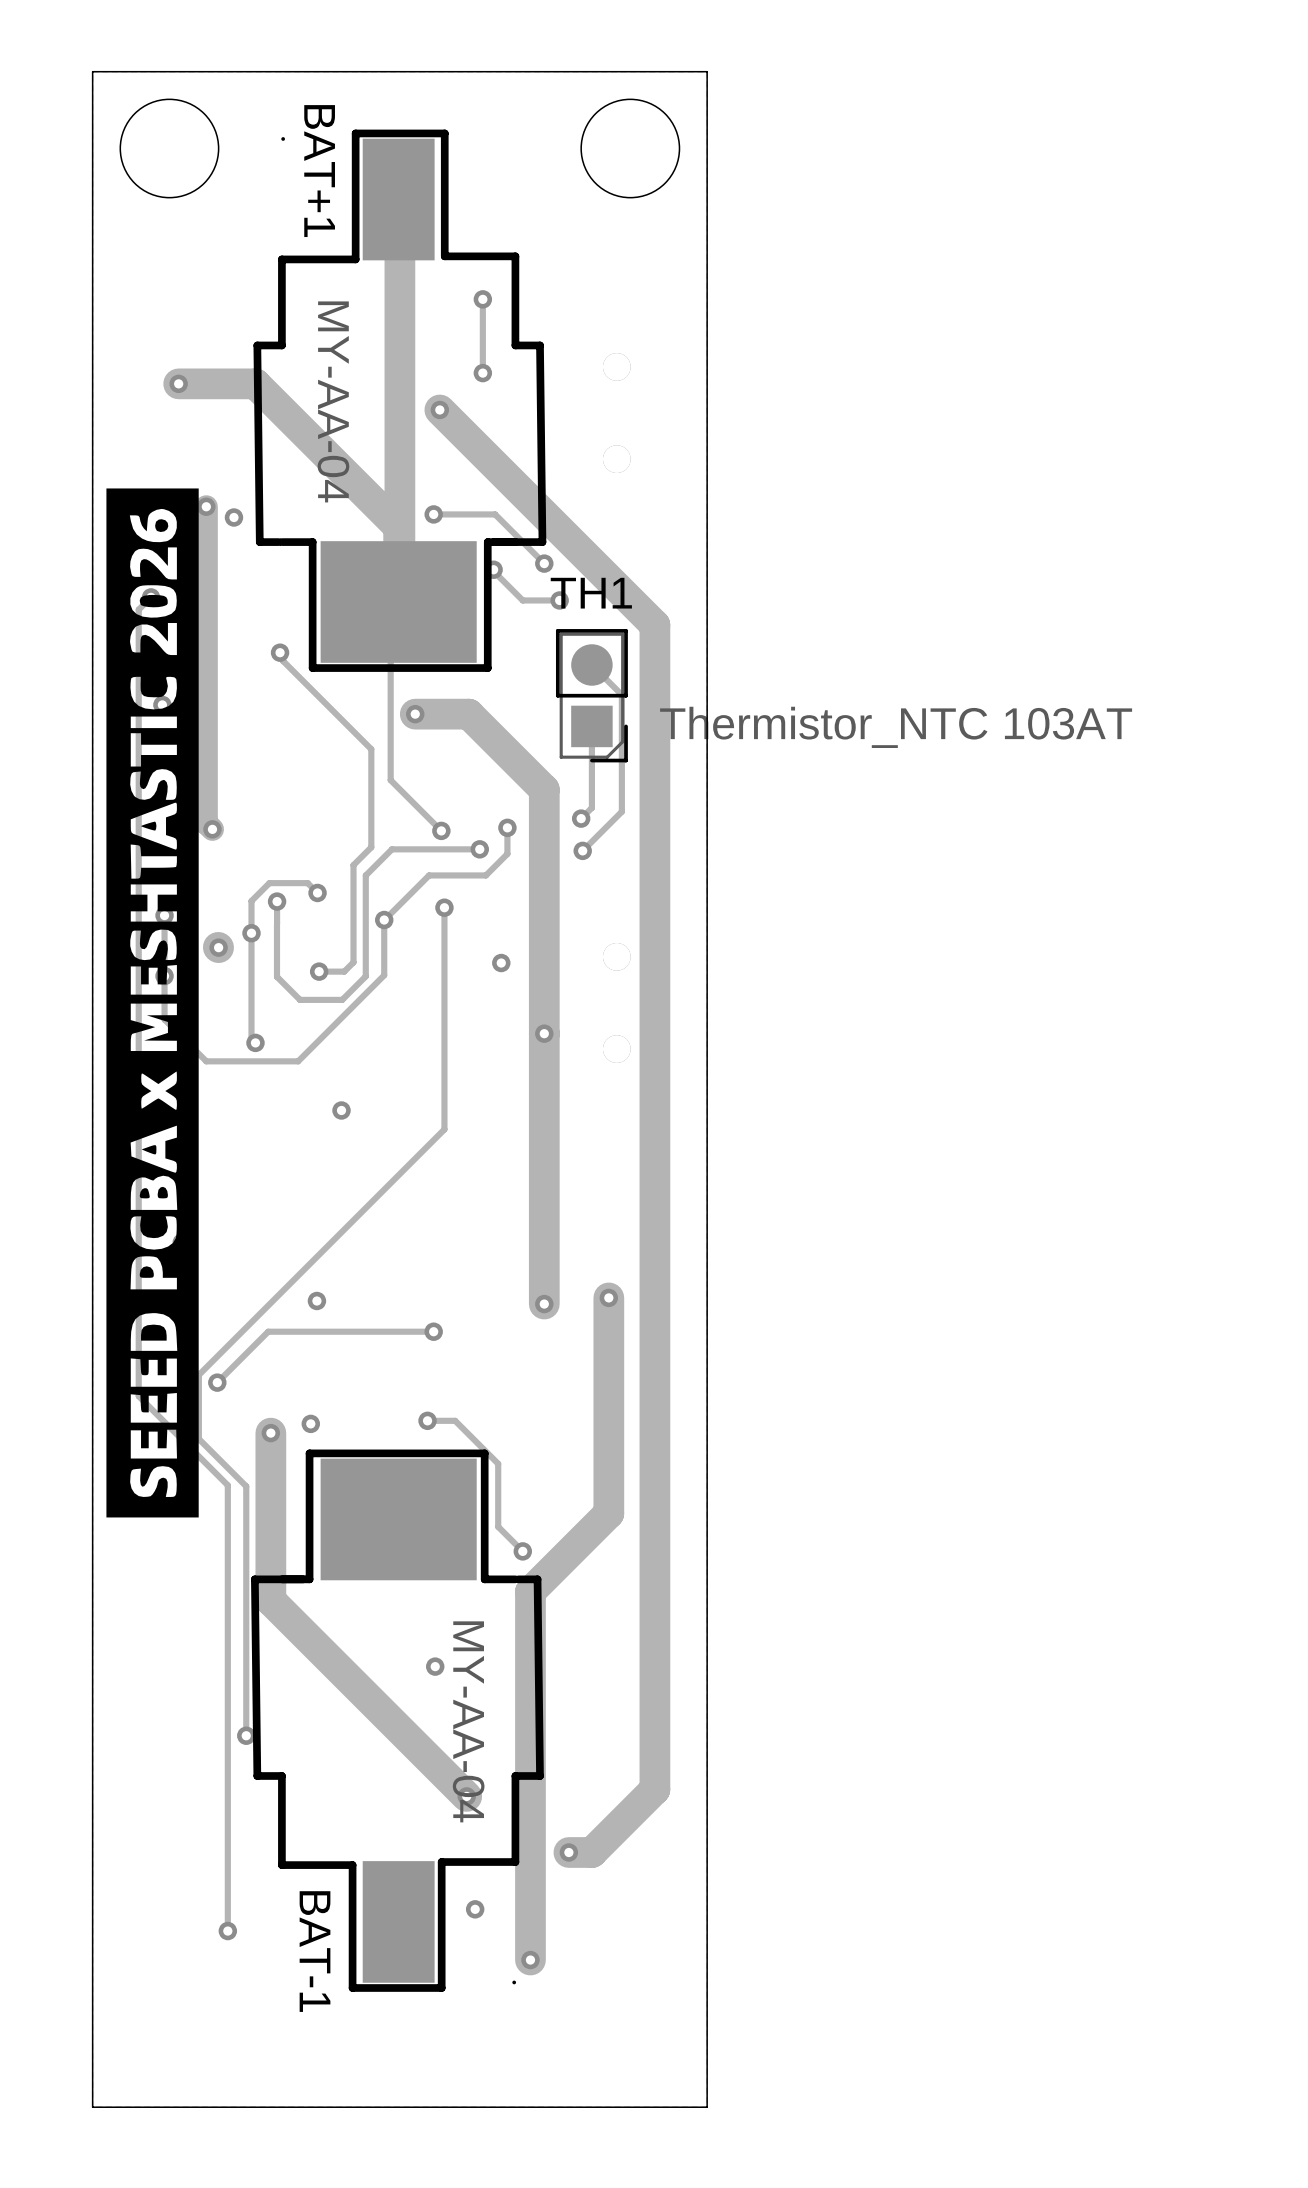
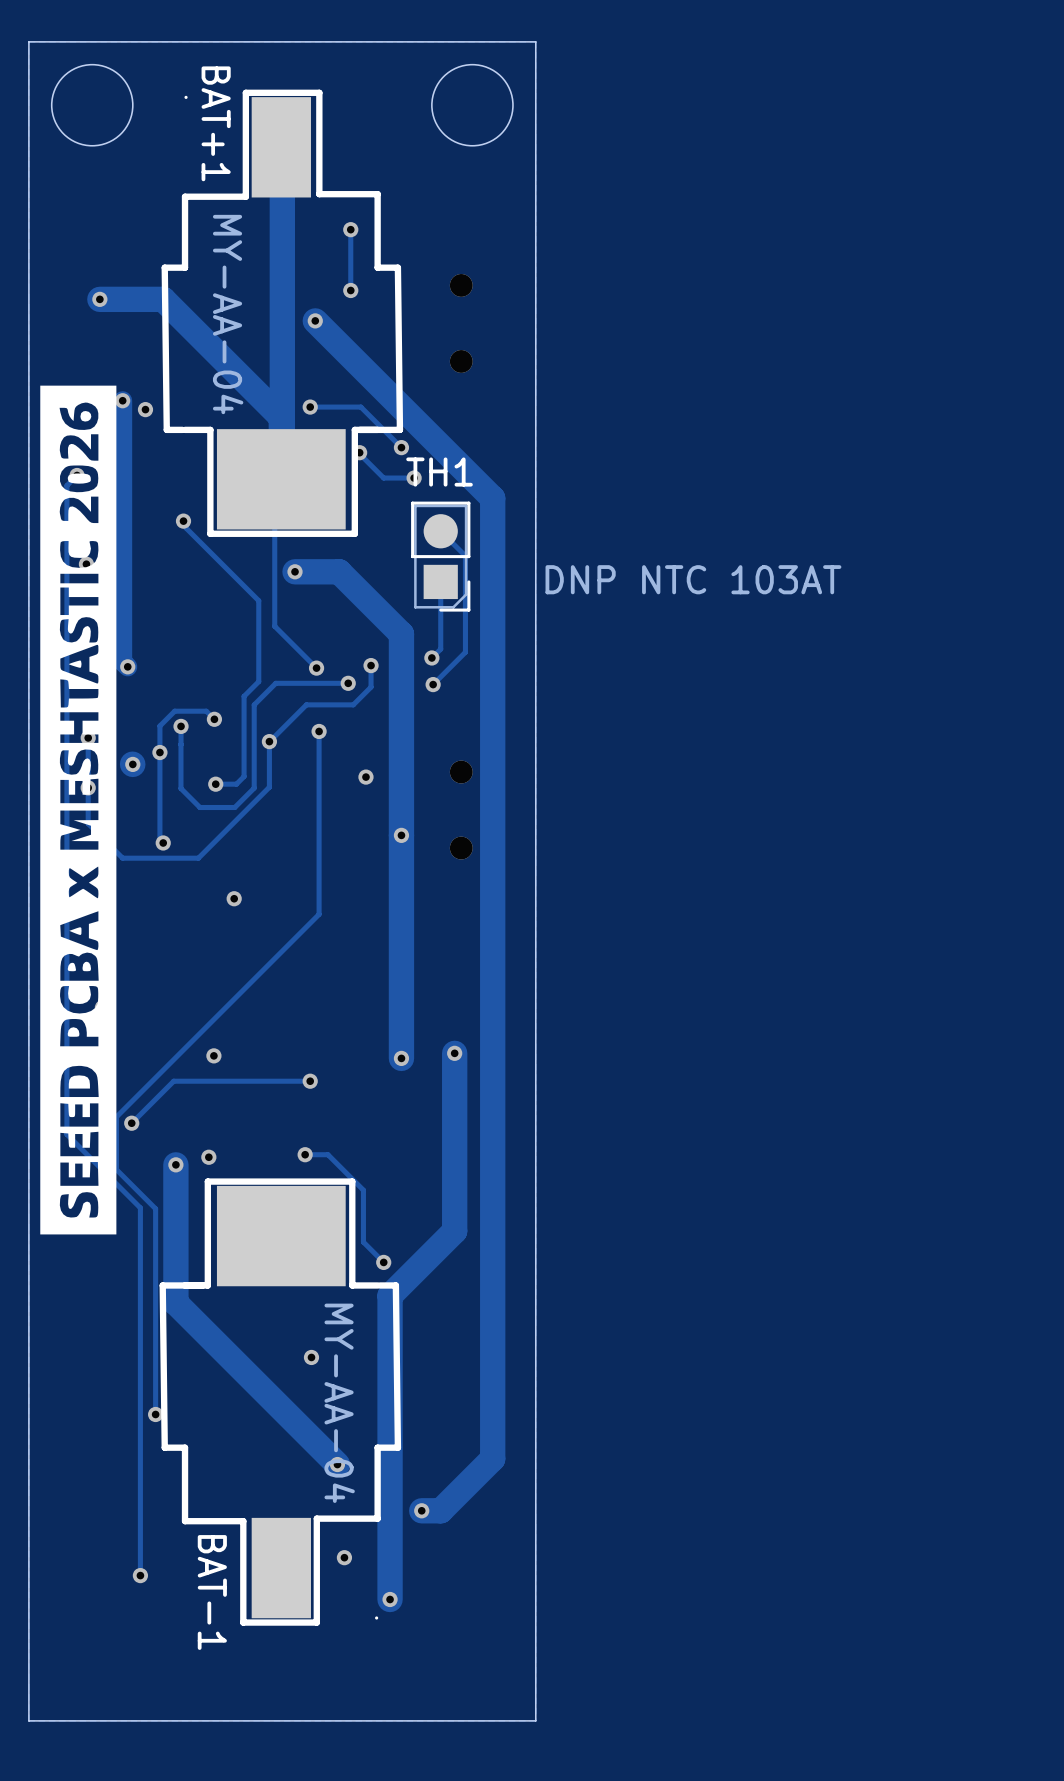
TH1 value: Thermistor_NTC 103AT (896, 727) -> DNP NTC 103AT (693, 579)

